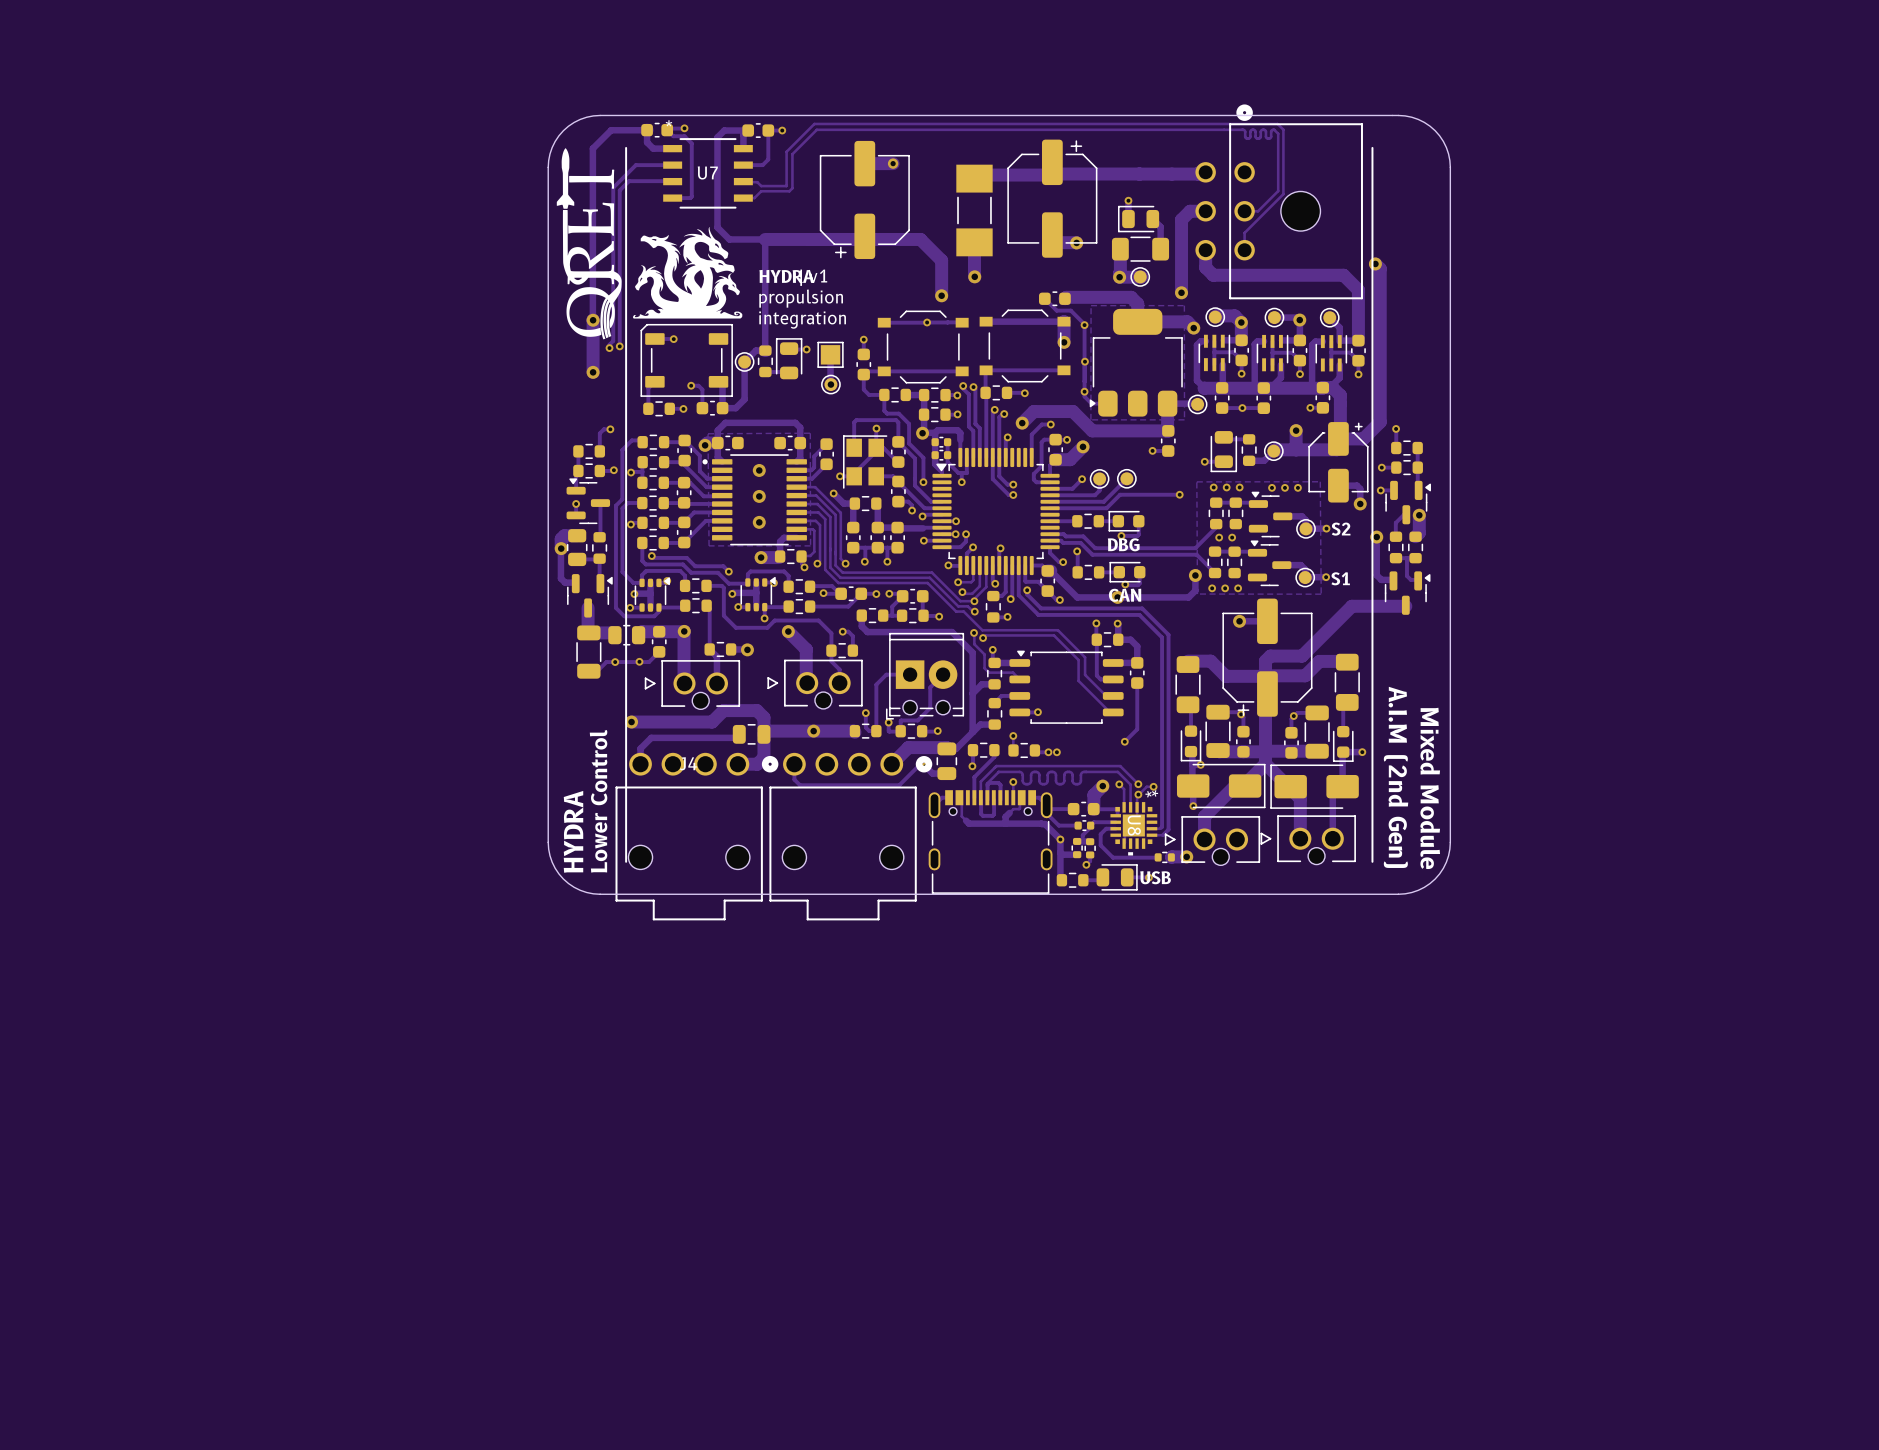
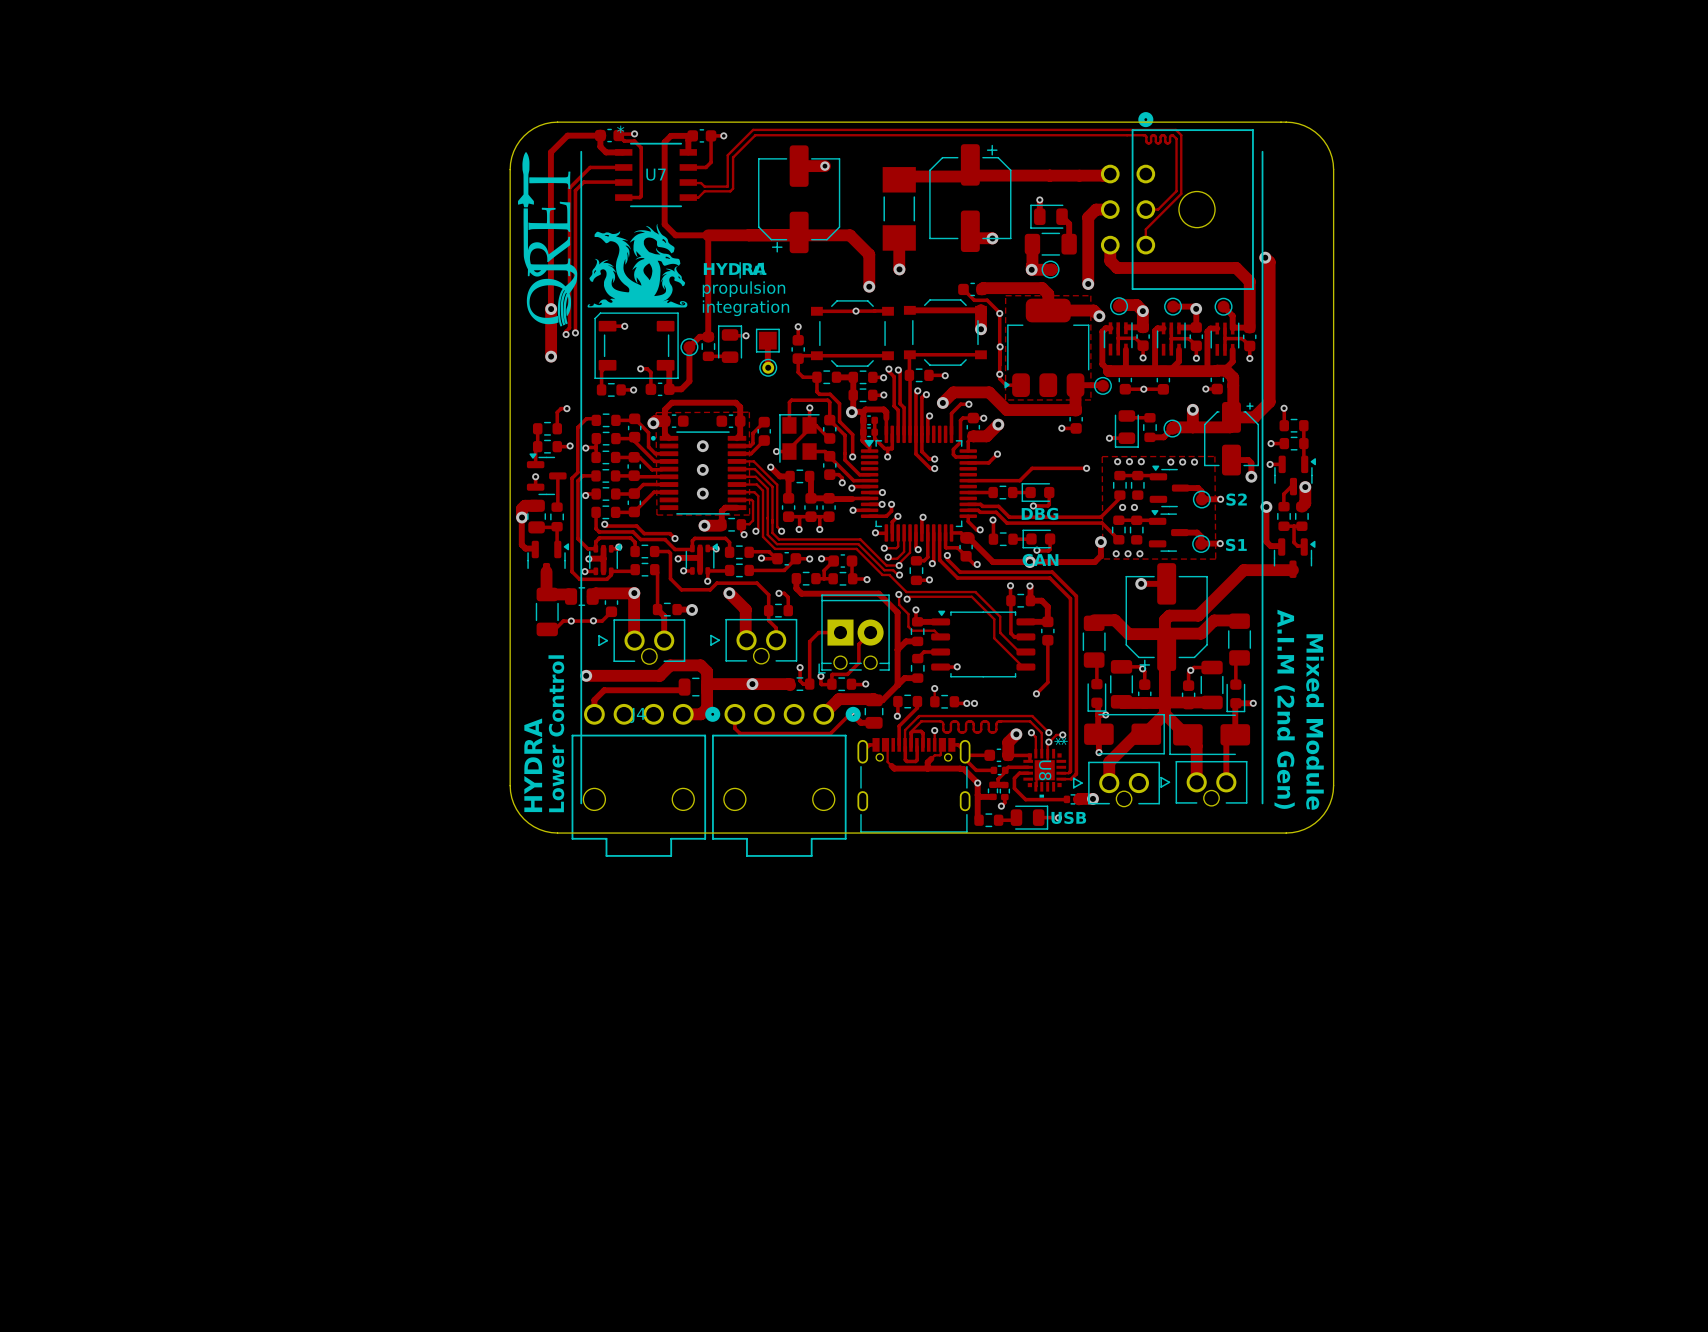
track: (1099, 478) (1099, 490) (1094, 495) (1050, 495) -> none
part: (1099, 478) -> none
track: (1126, 478) (1103, 501) (1050, 501) -> none
part: (1126, 478) -> none

